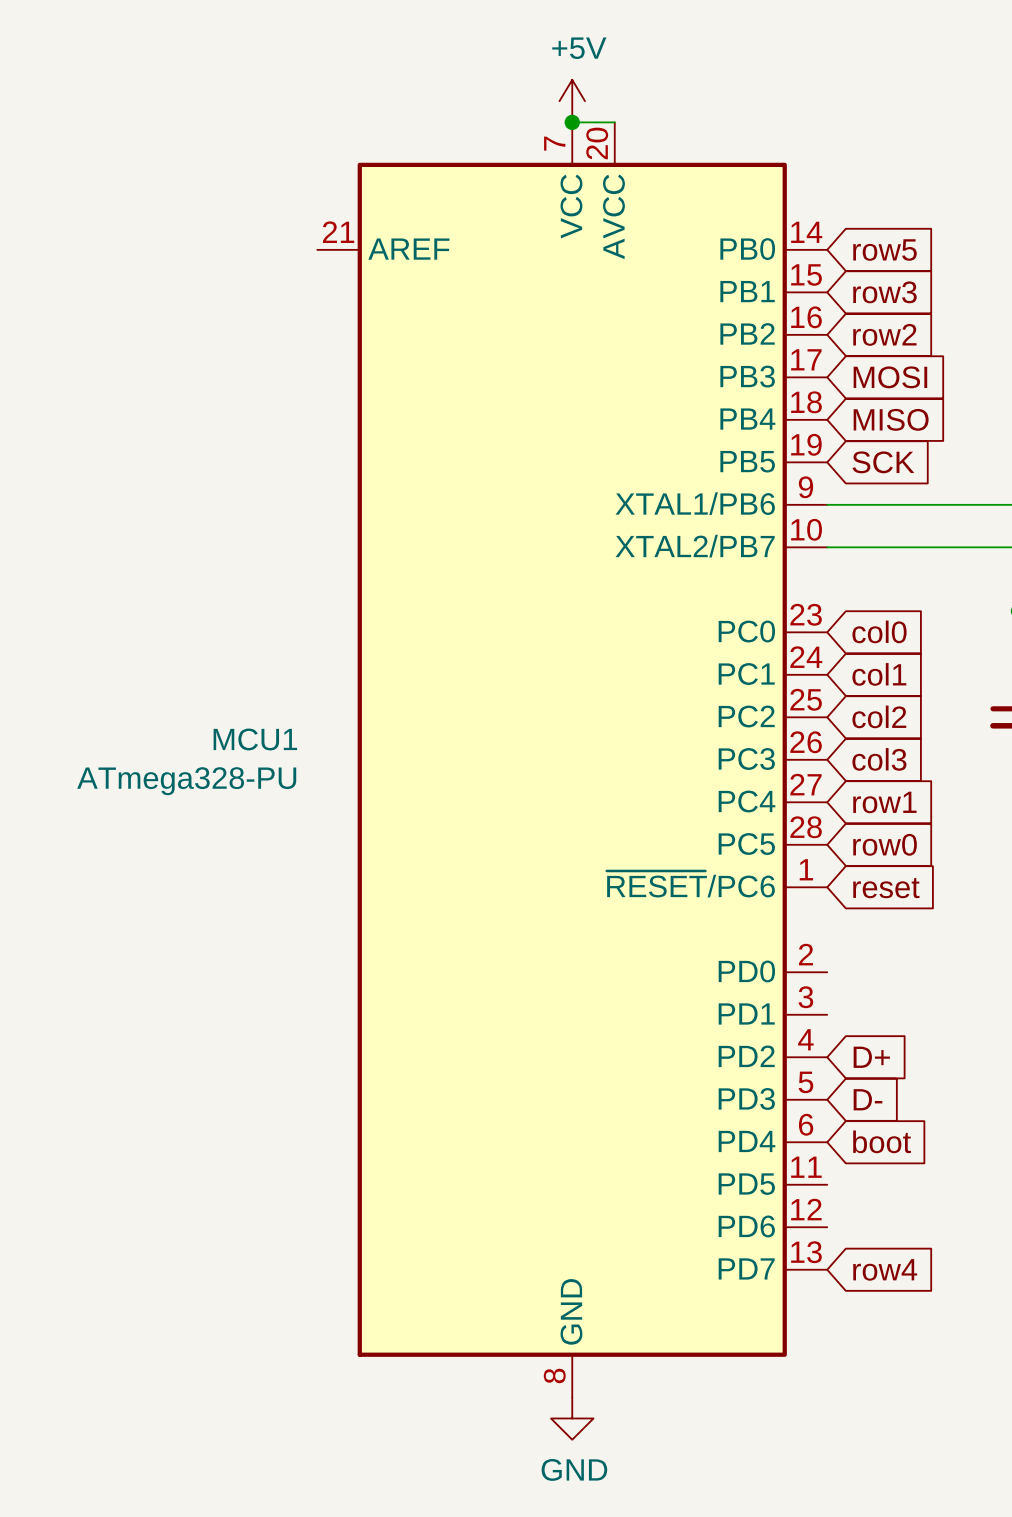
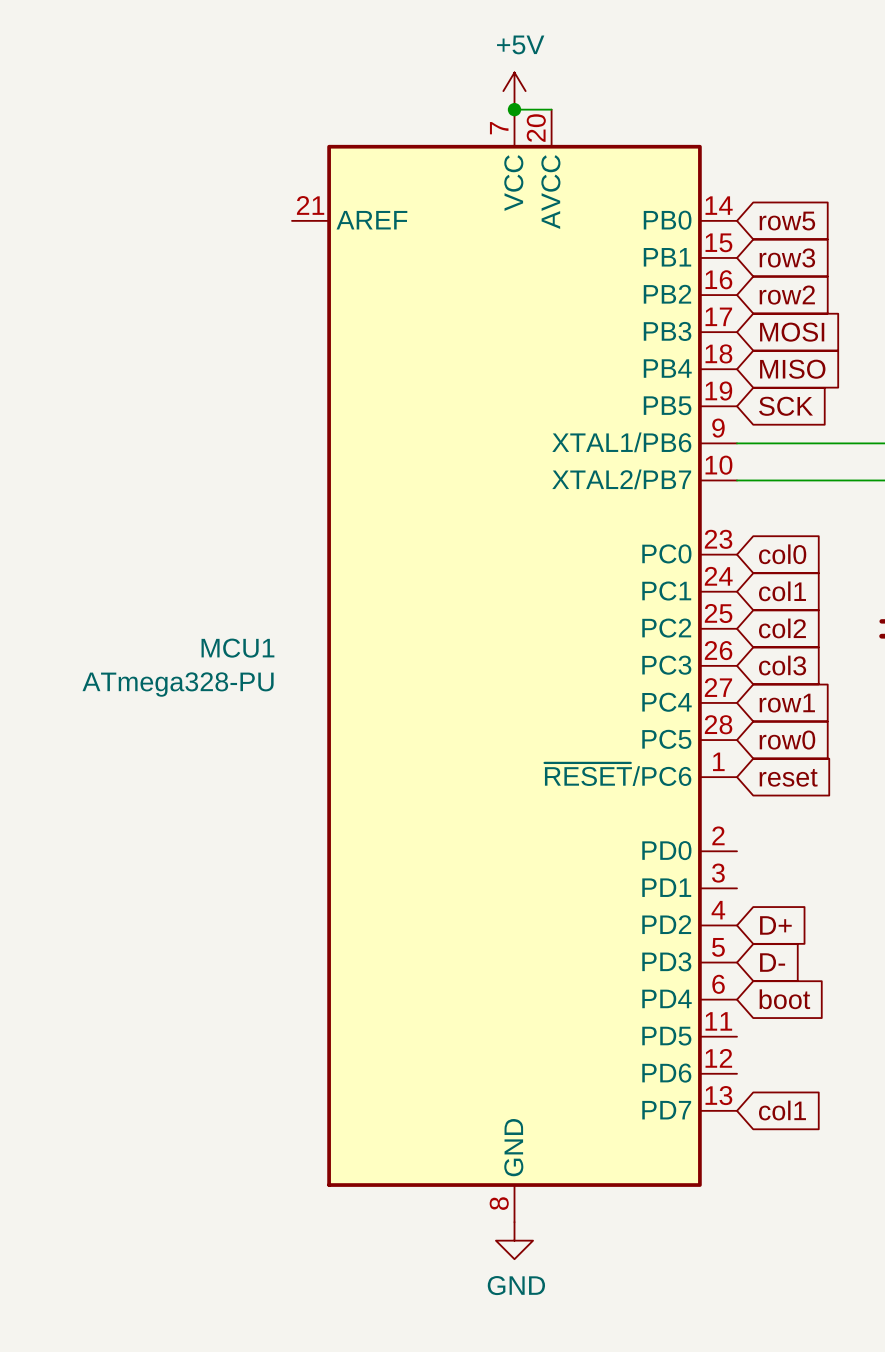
global label: row4 (885, 1269) -> col1 (782, 1110)

